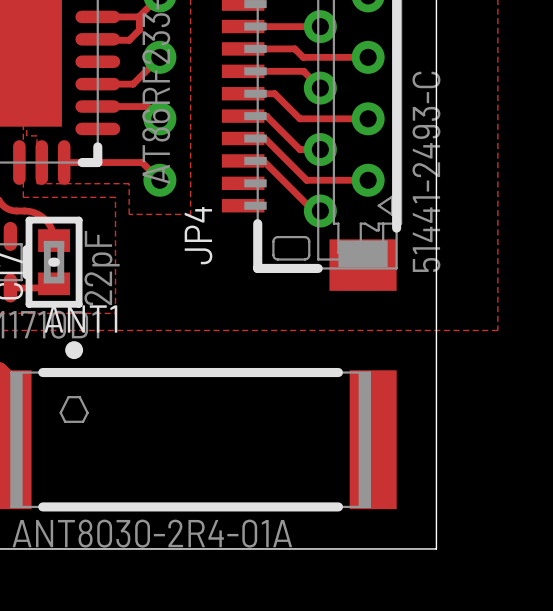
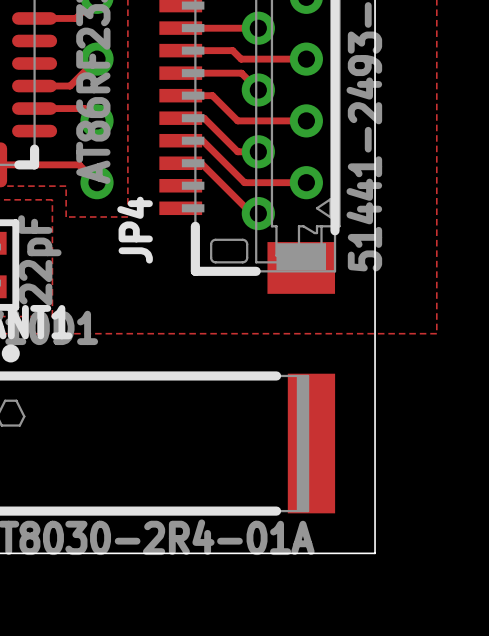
track: (139, 16) (139, 30) (129, 40) (97, 39) -> none

